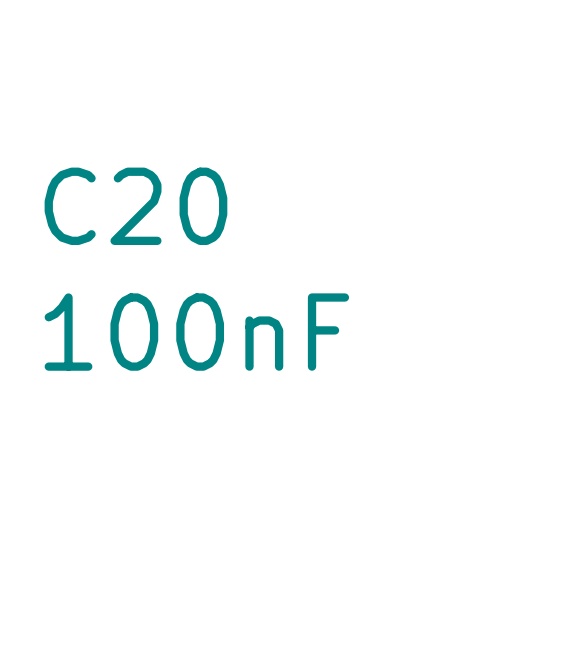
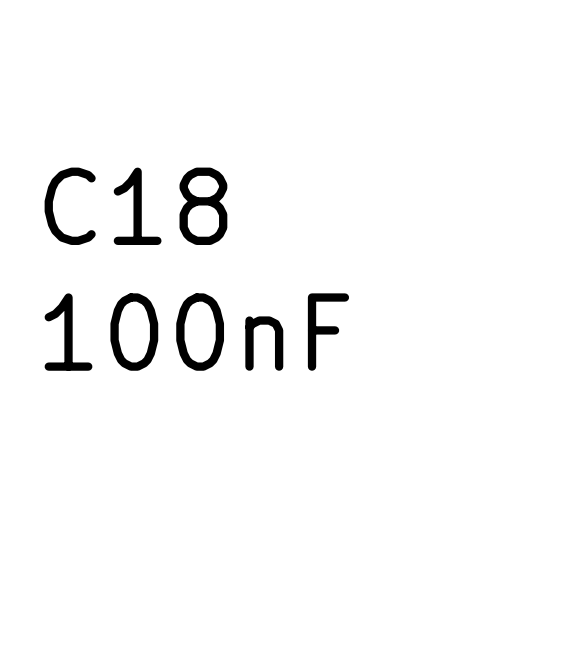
C20 name: C20 (135, 206) -> C18 (135, 206)

